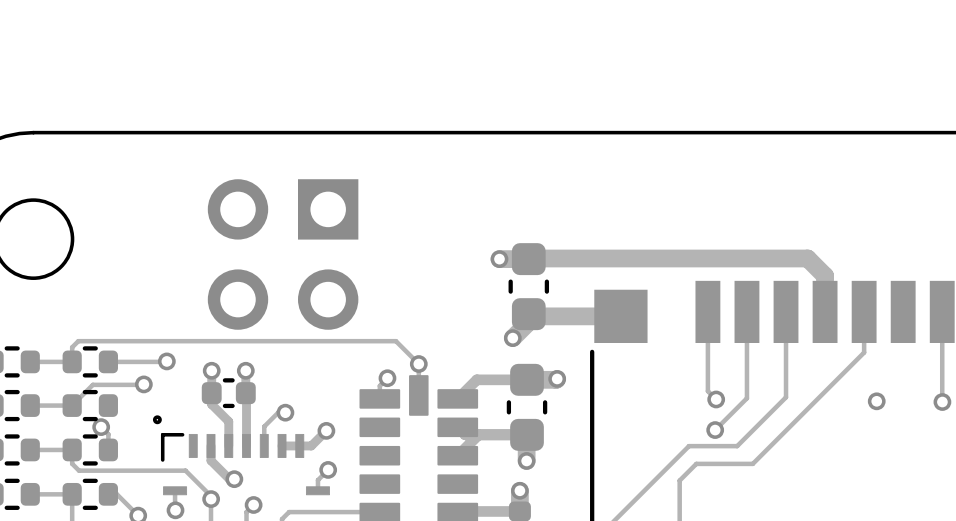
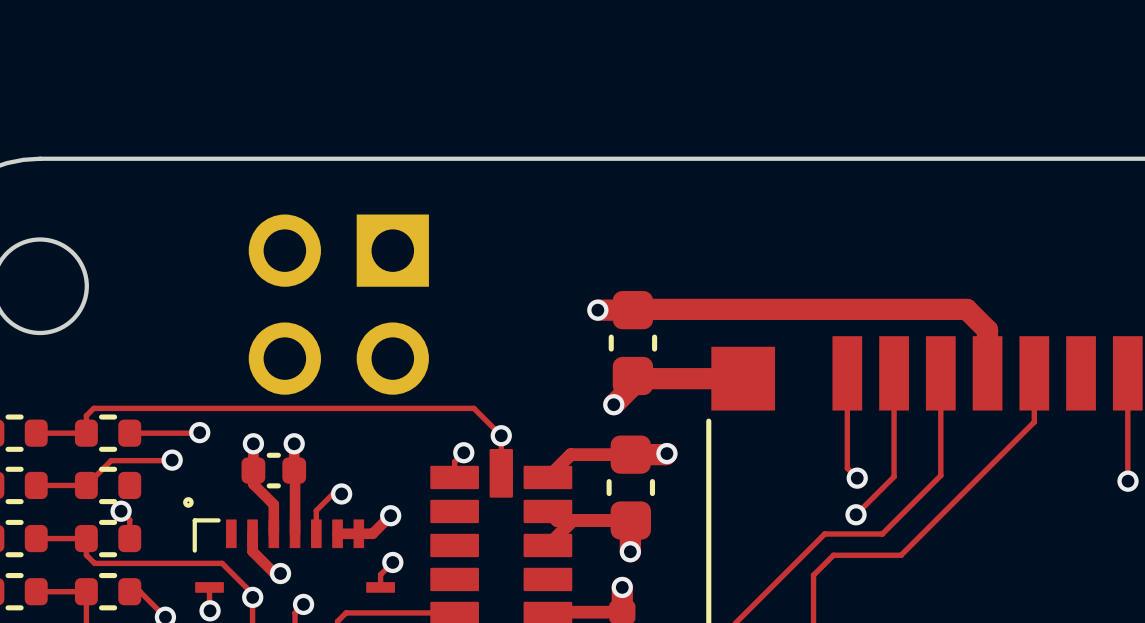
via: (876, 401) -> none

